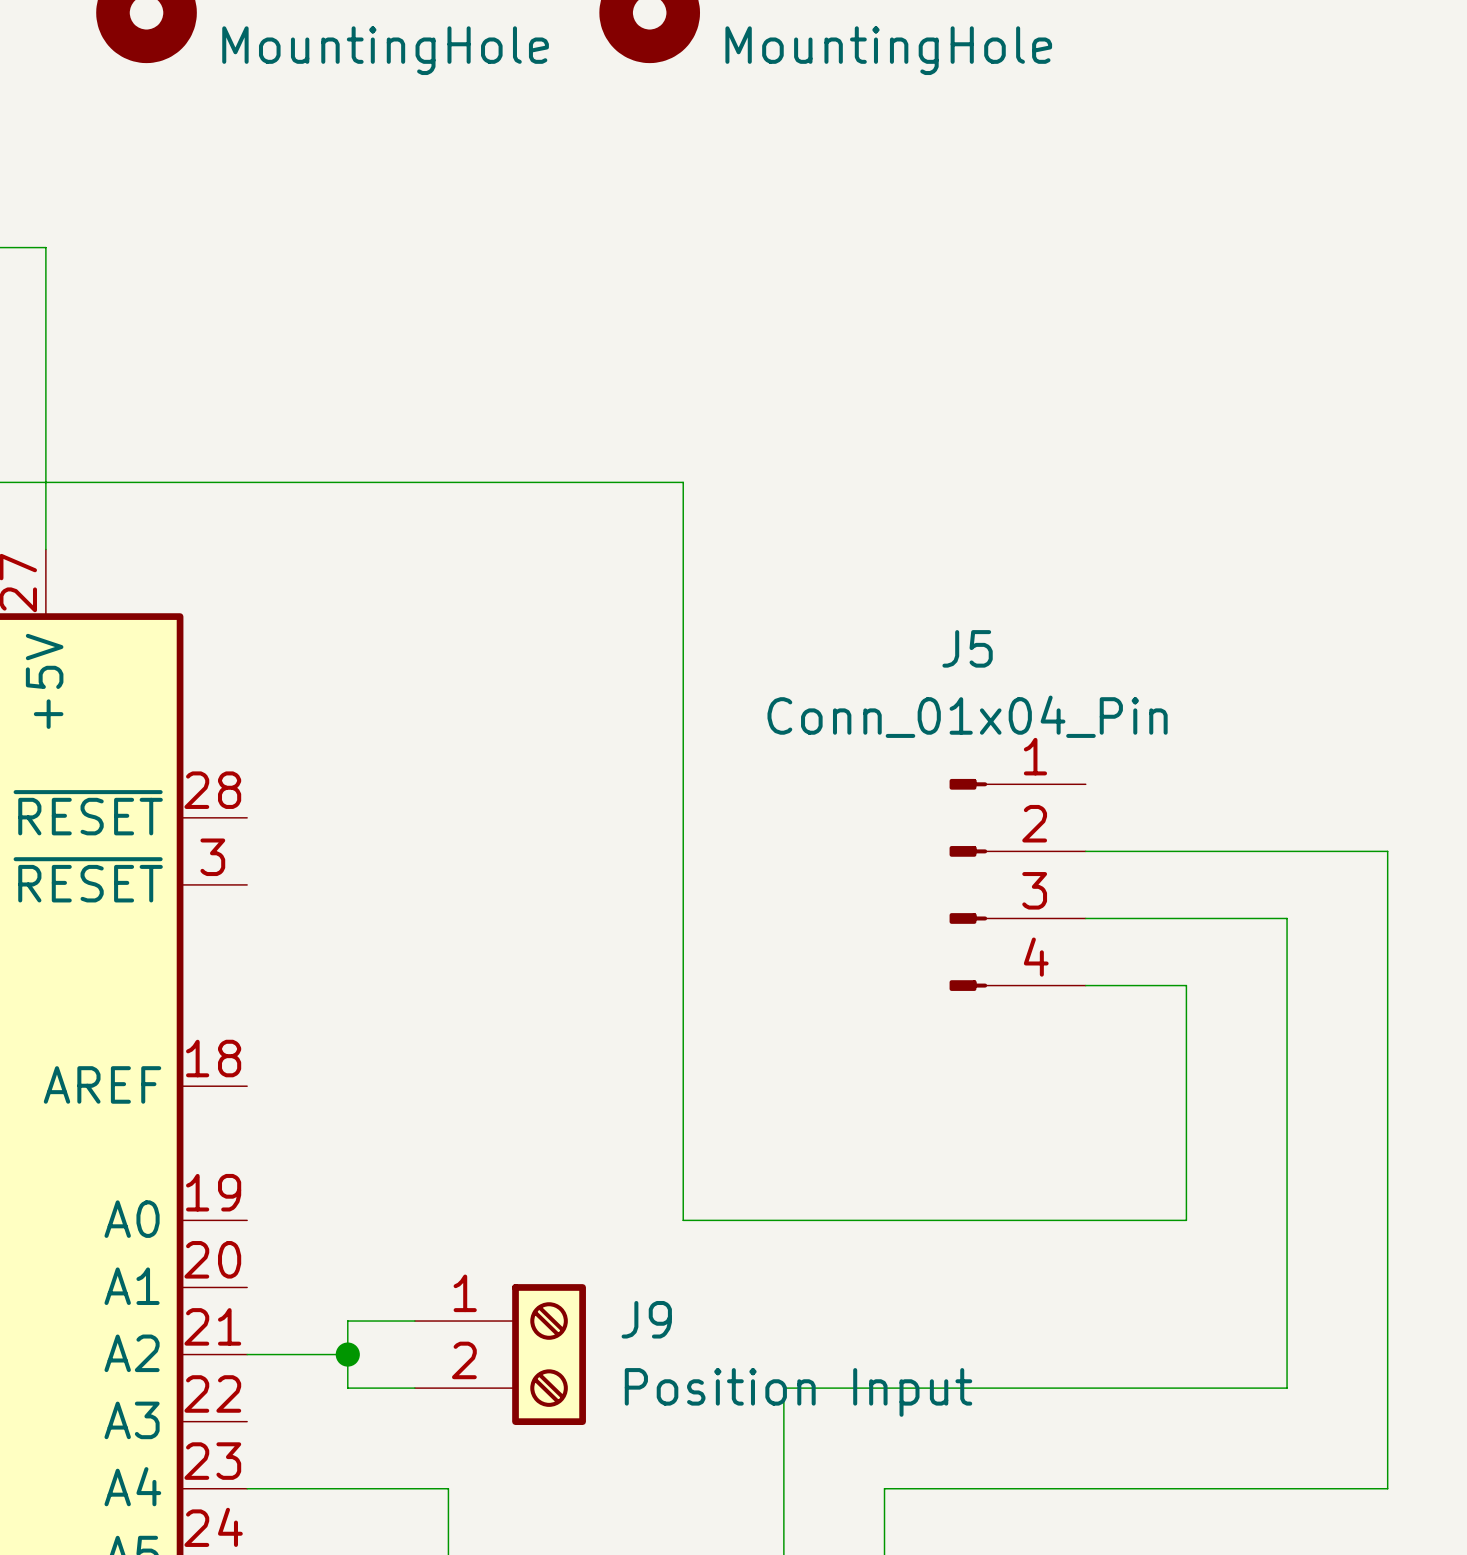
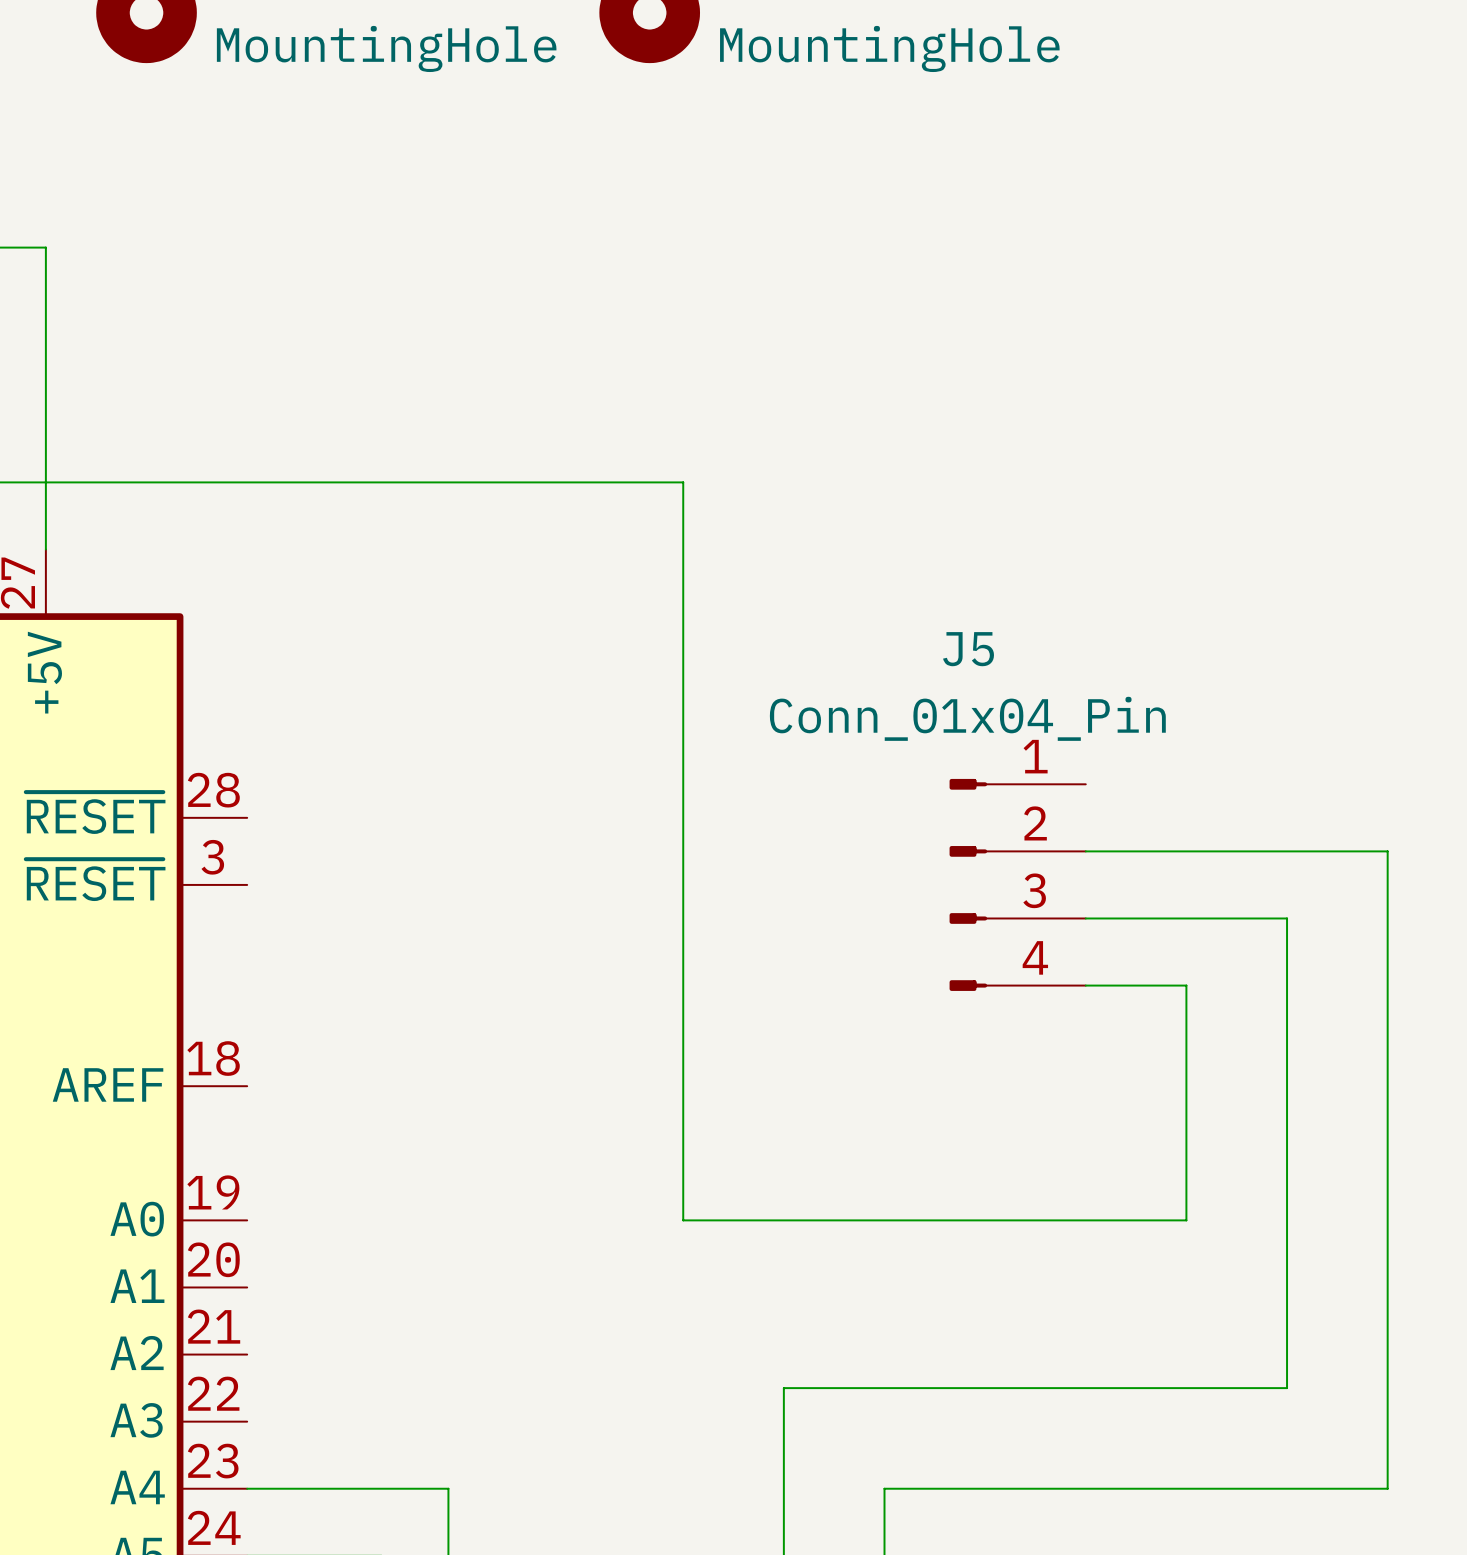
wire: (414, 1321) (347, 1321) (347, 1388) (414, 1388) -> none
wire: (247, 1354) (347, 1354) -> none
junction: (347, 1354) -> none
J9: Position Input (500, 1354) -> none

